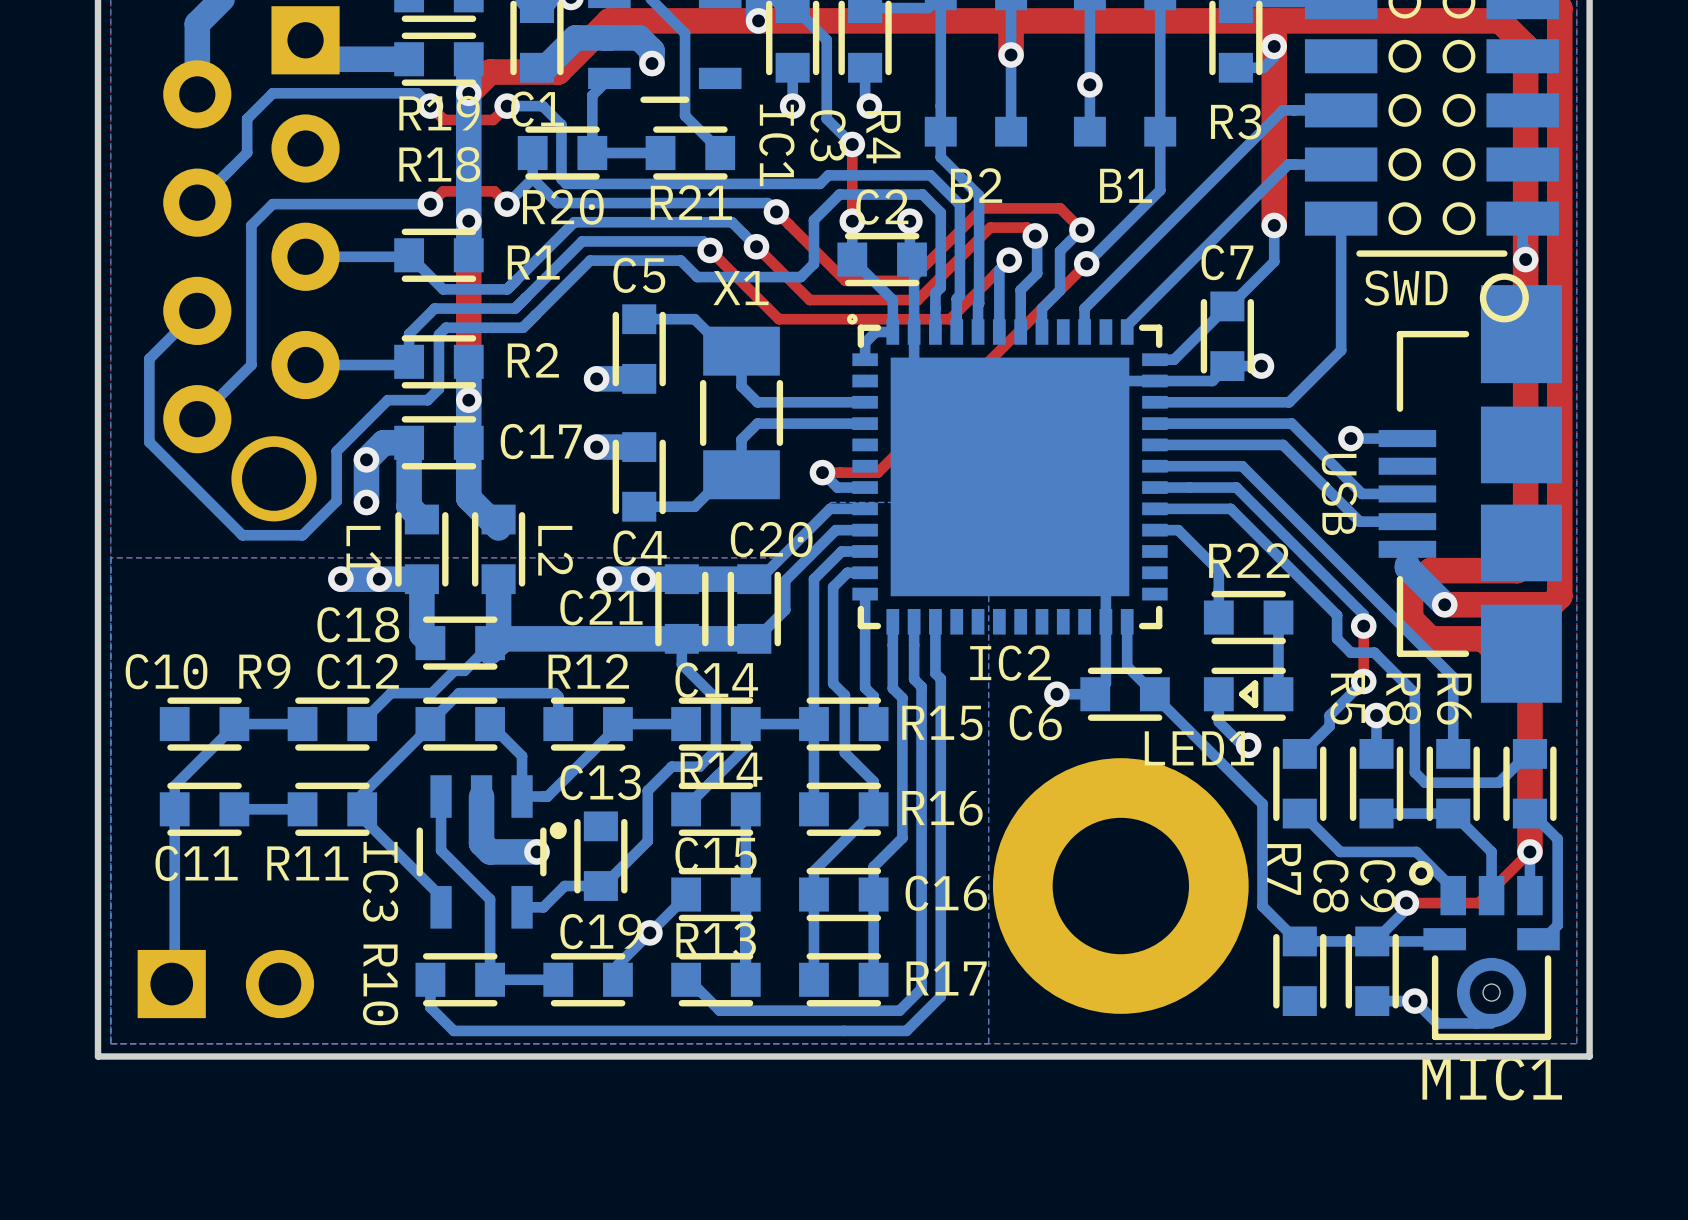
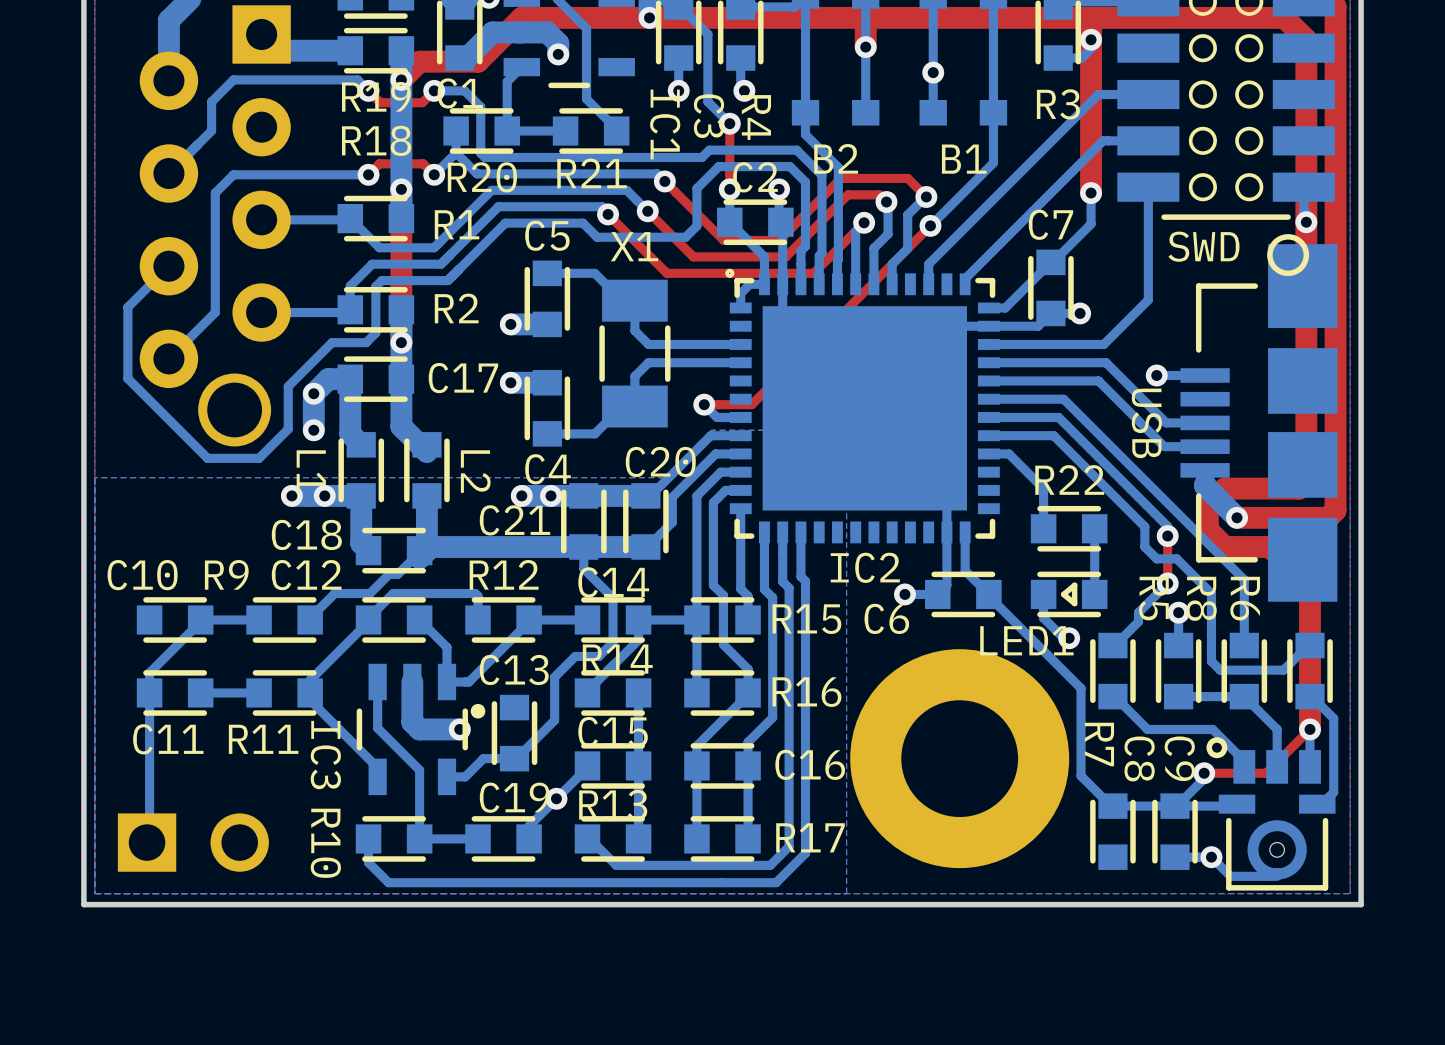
MIC1 name: MIC1 (1492, 1078) -> none

